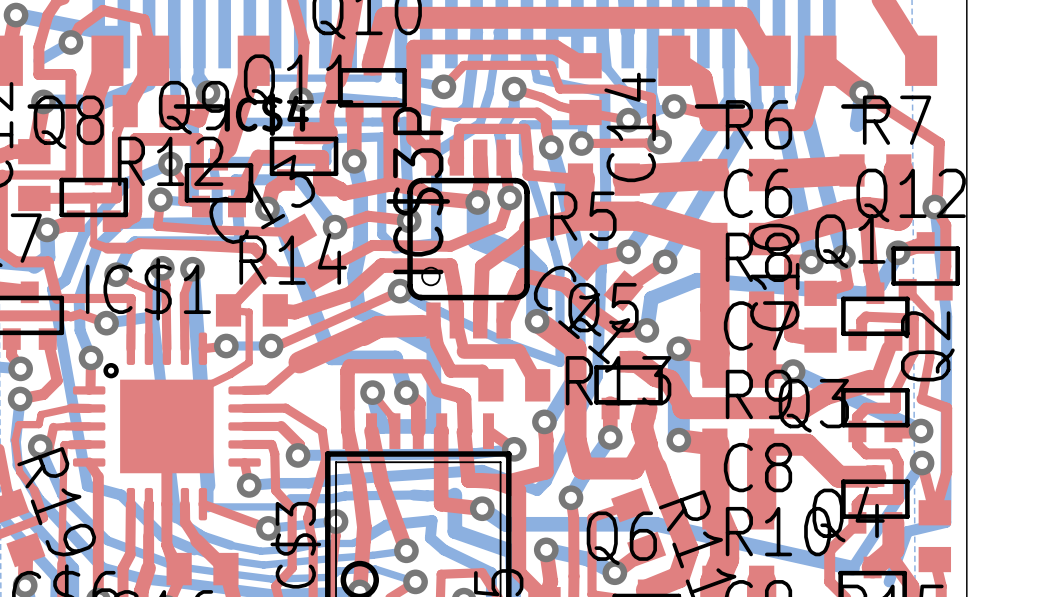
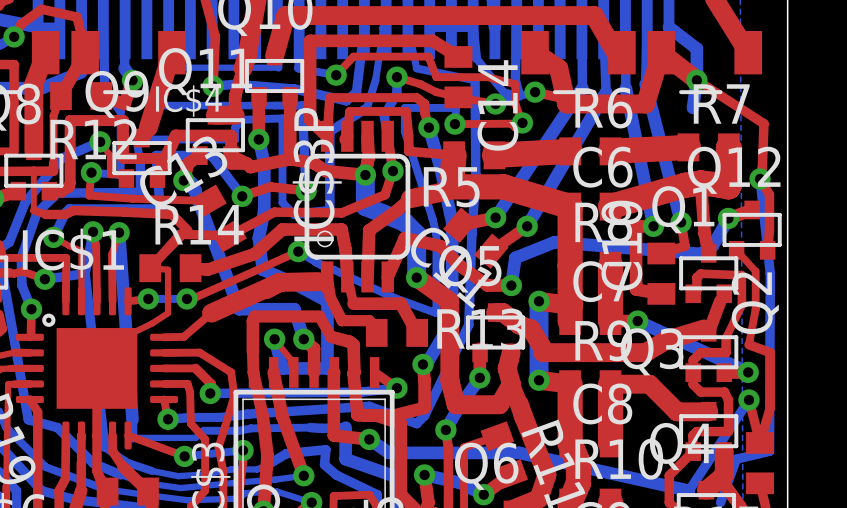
bottom track: none -> (668, 27) (696, 48) (696, 80)

